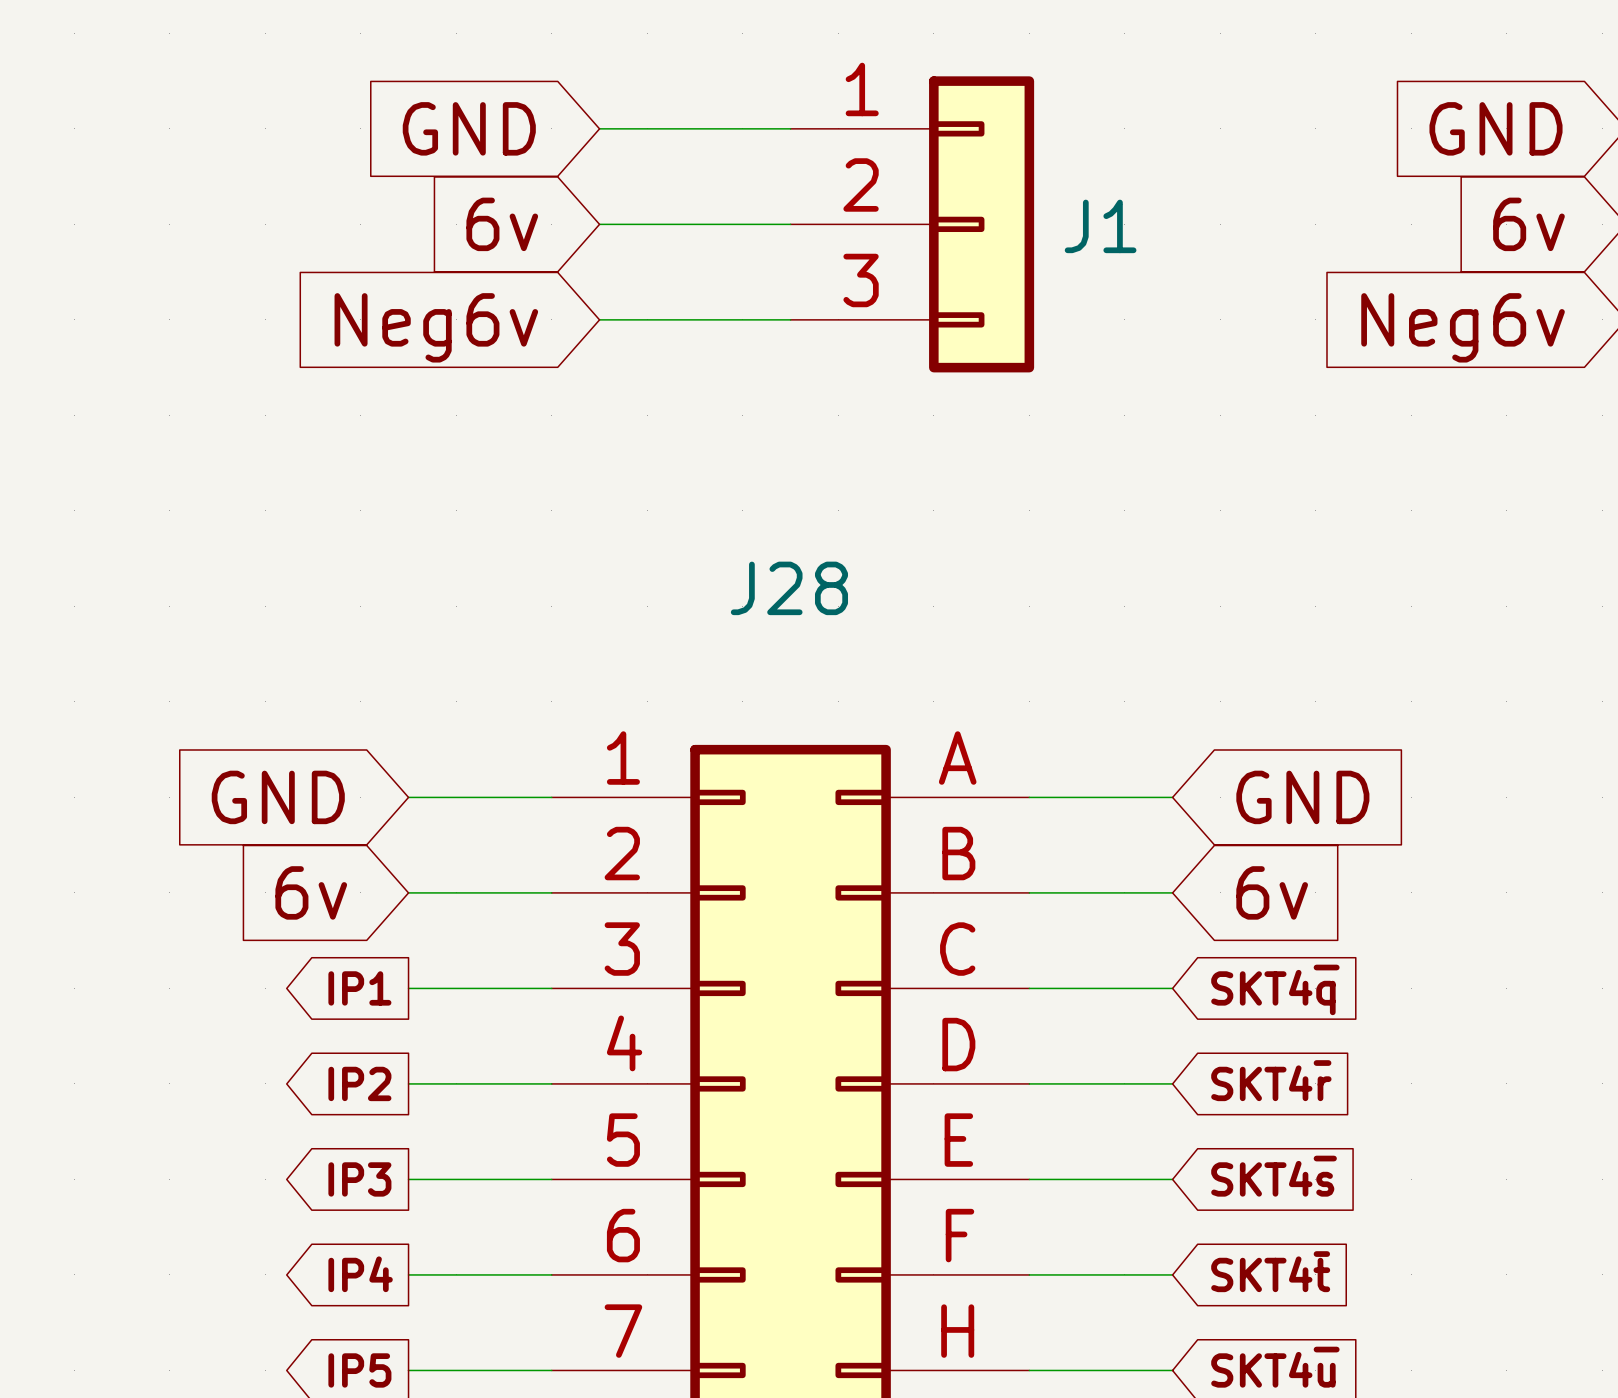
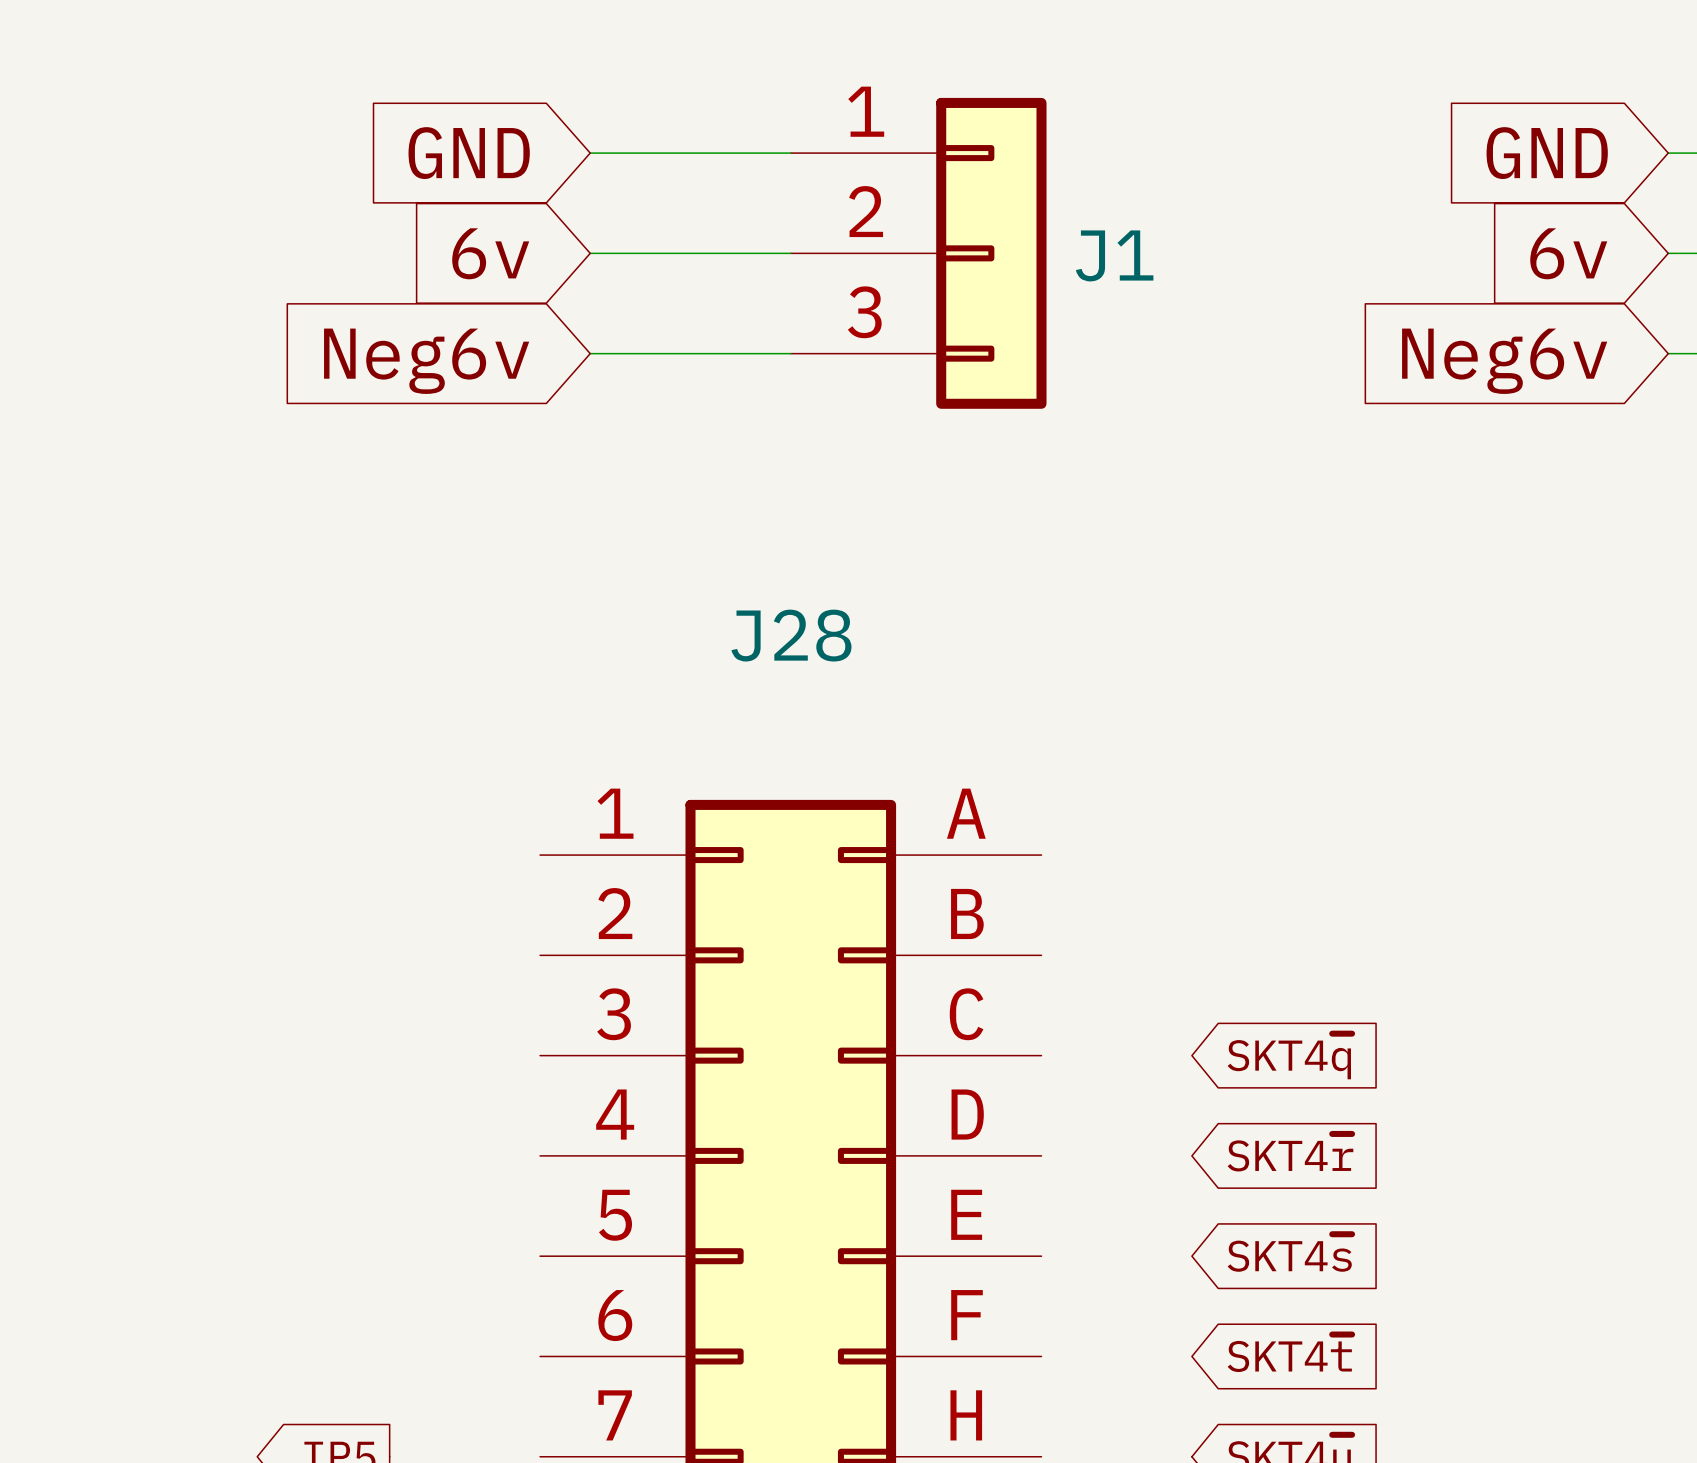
global label: GND (278, 797) -> none
wire: (408, 797) (551, 797) -> none
wire: (1029, 797) (1172, 797) -> none
global label: GND (1302, 797) -> none
global label: 6v (311, 892) -> none
wire: (408, 892) (551, 892) -> none
wire: (1029, 892) (1172, 892) -> none
global label: 6v (1272, 892) -> none
global label: IP1 (359, 988) -> none
wire: (408, 988) (551, 988) -> none
wire: (1029, 988) (1172, 988) -> none
global label: IP2 (359, 1083) -> none
wire: (408, 1083) (551, 1083) -> none
wire: (1029, 1083) (1172, 1083) -> none
global label: IP3 (359, 1179) -> none
wire: (408, 1179) (551, 1179) -> none
wire: (1029, 1179) (1172, 1179) -> none
global label: IP4 (360, 1274) -> none
wire: (408, 1274) (551, 1274) -> none
wire: (1029, 1274) (1172, 1274) -> none
wire: (408, 1370) (551, 1370) -> none
wire: (1029, 1370) (1172, 1370) -> none

